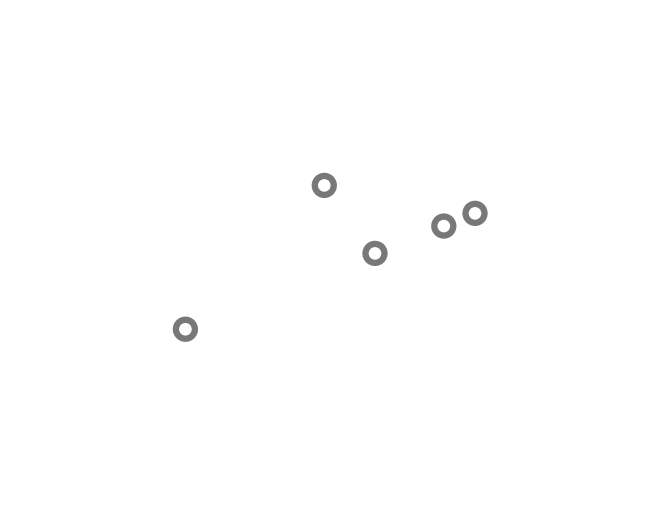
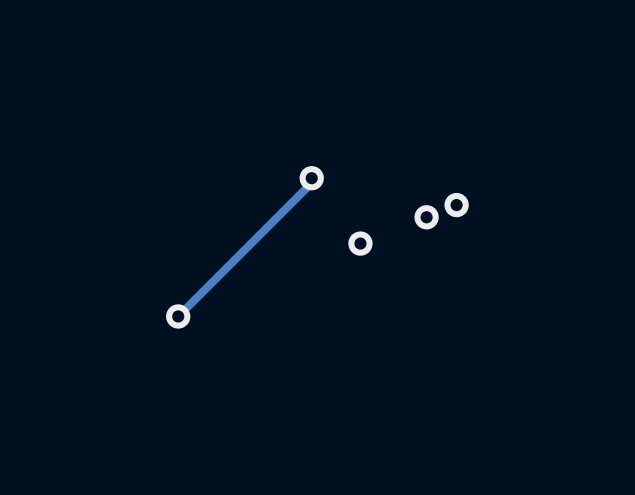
track: none -> (311, 182) (178, 316)

